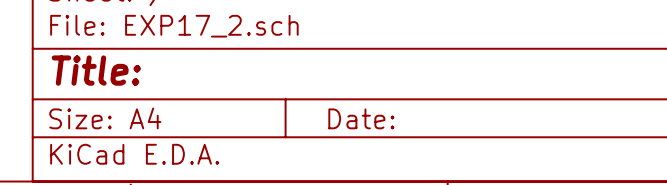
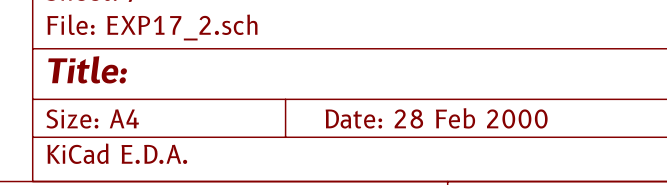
title block: Date: (361, 118) -> Date: 28 Feb 2000 (436, 118)

